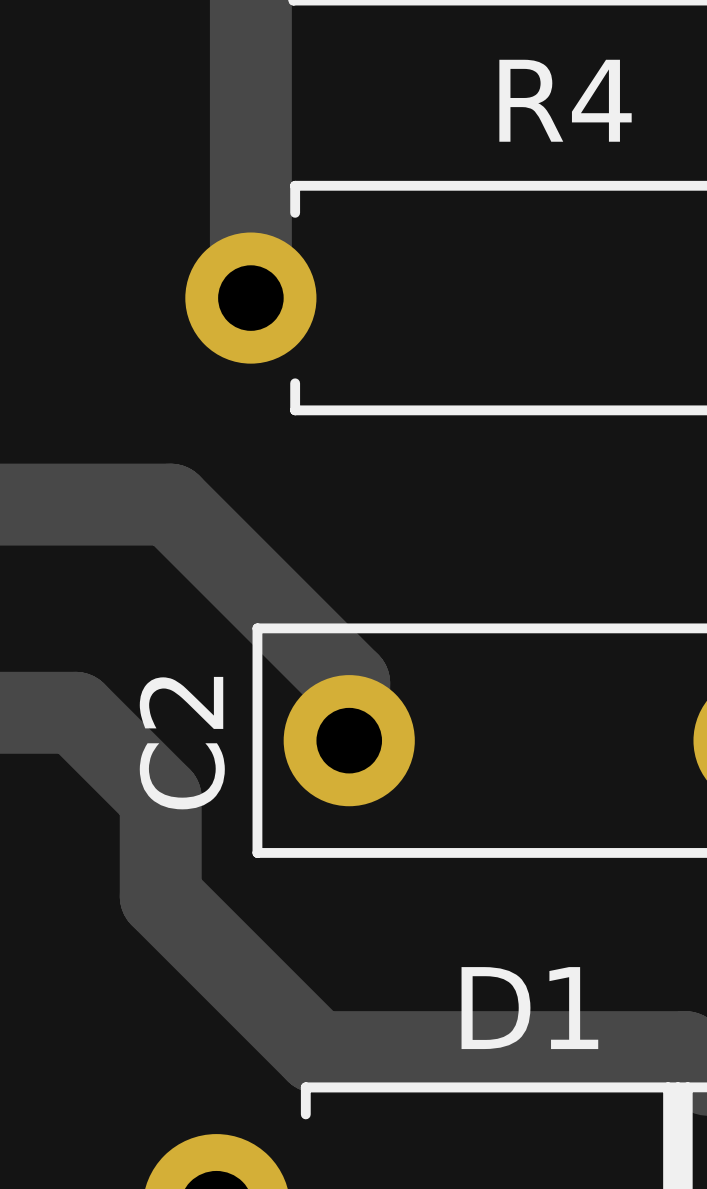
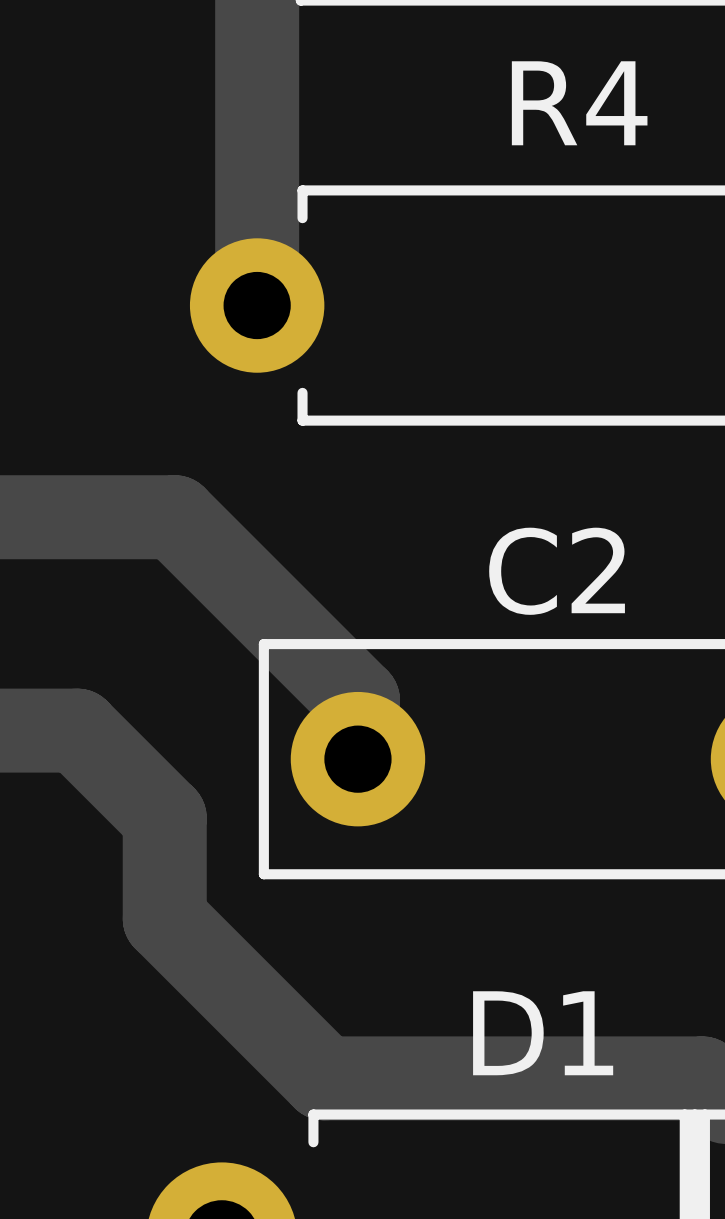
C2 name rotation: 0° (182, 743) -> 90° clockwise (557, 571)
C2 name position: C2 (182, 743) -> C2 (557, 571)

